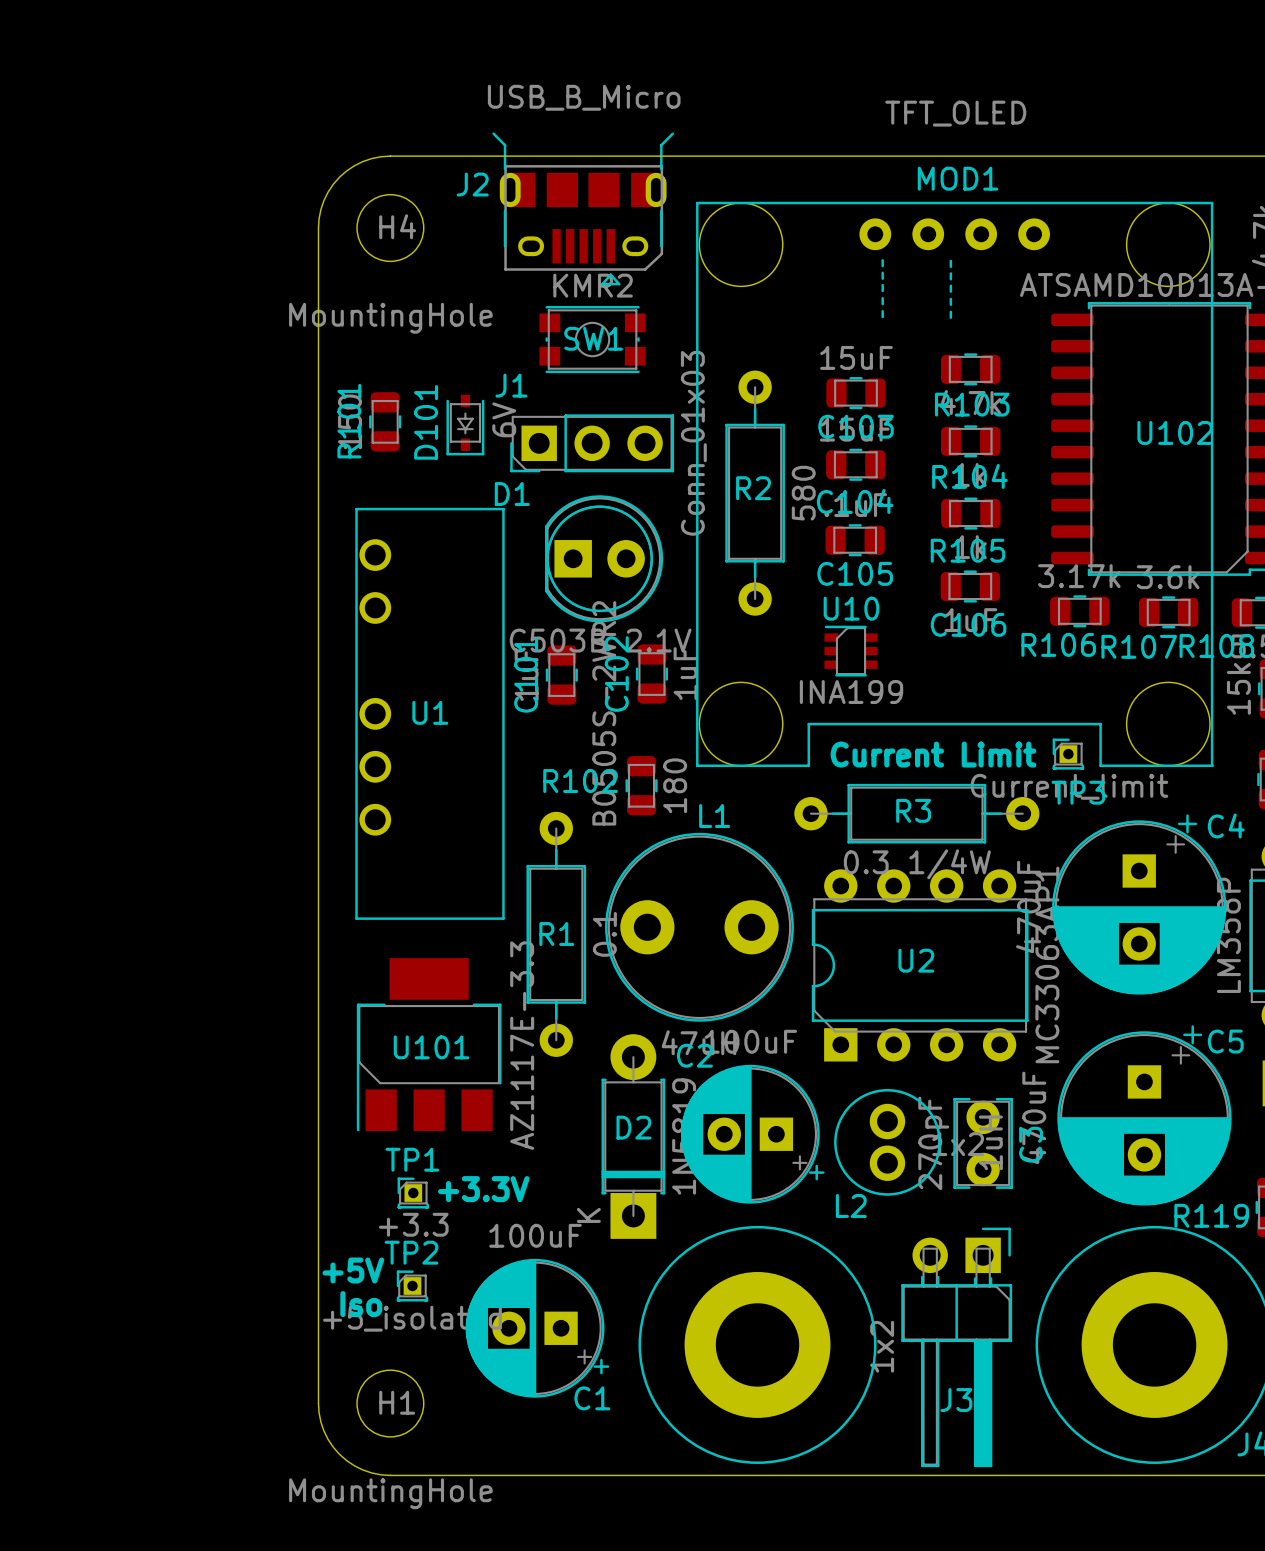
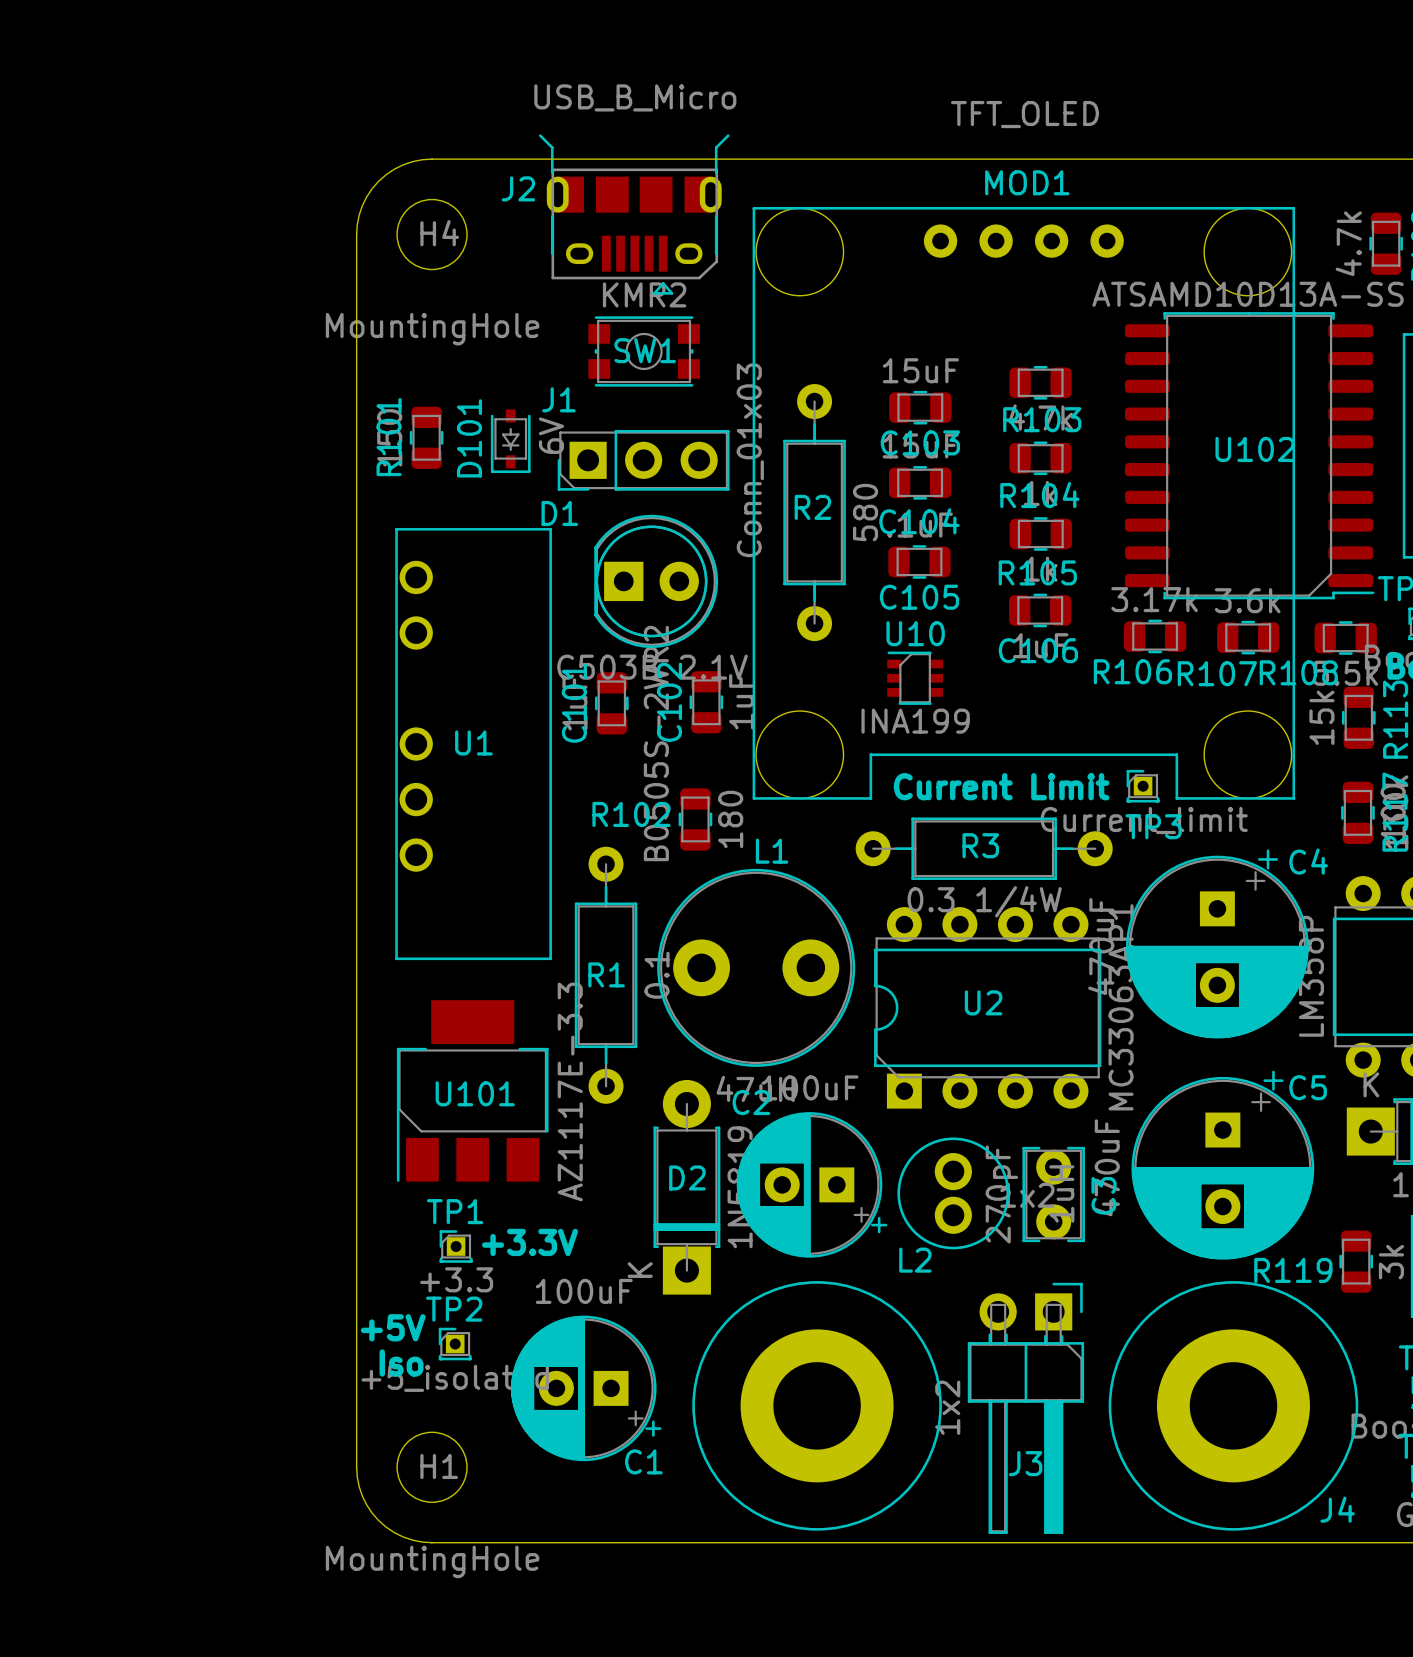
line: (882, 260) (882, 266) -> none
line: (950, 260) (950, 266) -> none
line: (882, 272) (882, 278) -> none
line: (950, 273) (950, 279) -> none
line: (882, 285) (882, 290) -> none
line: (950, 285) (950, 291) -> none
line: (882, 298) (882, 304) -> none
line: (950, 298) (950, 304) -> none
line: (882, 311) (882, 317) -> none
line: (950, 311) (950, 317) -> none

